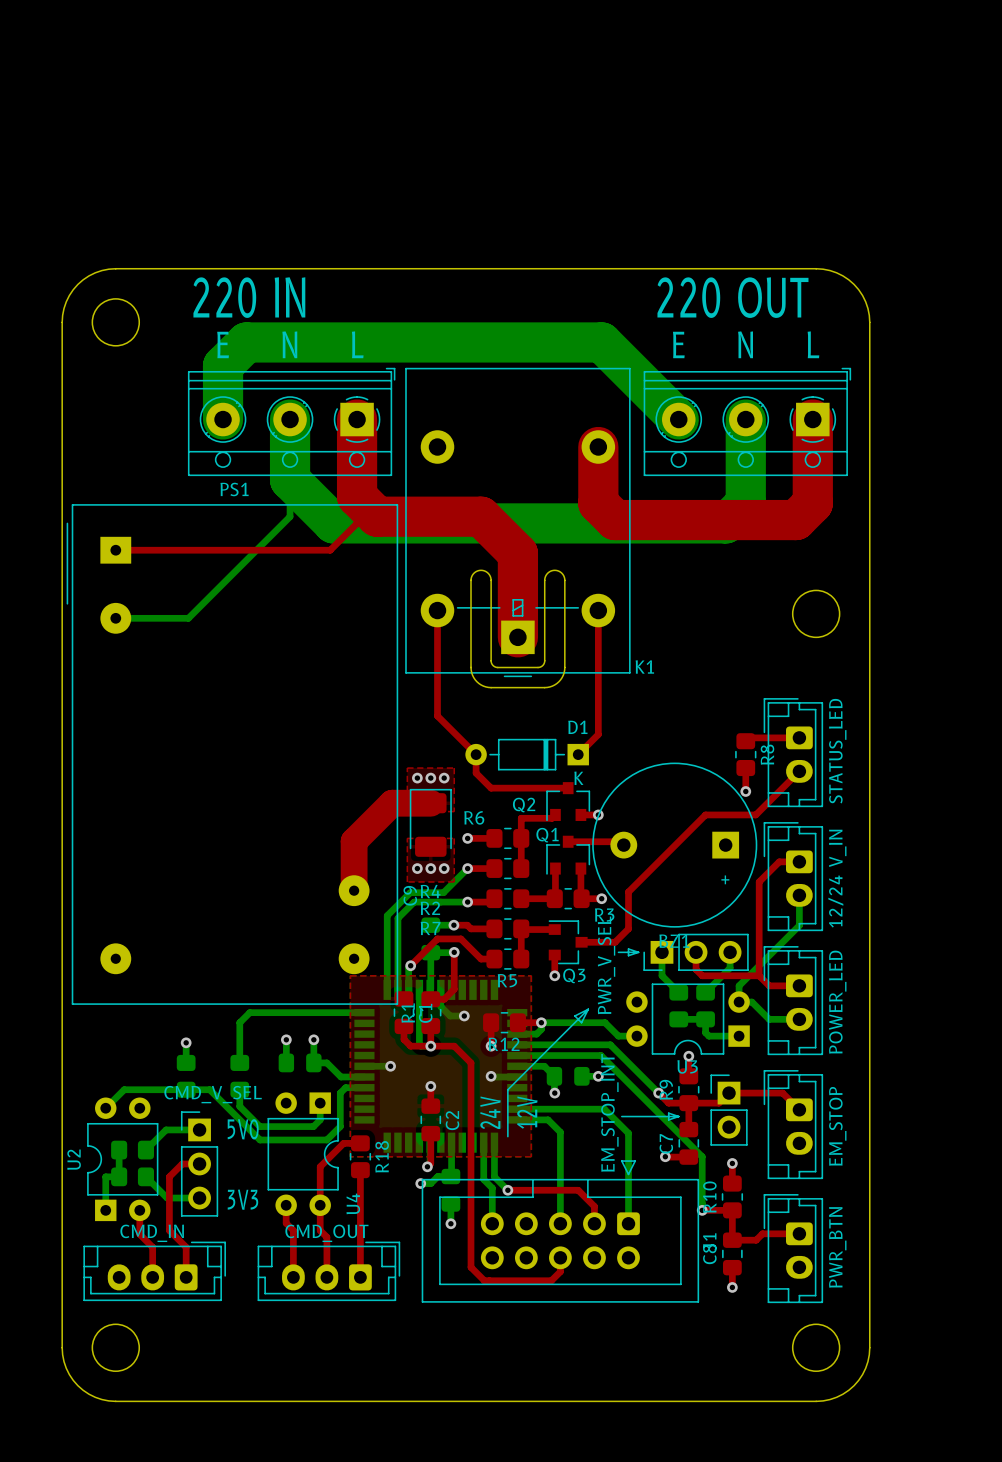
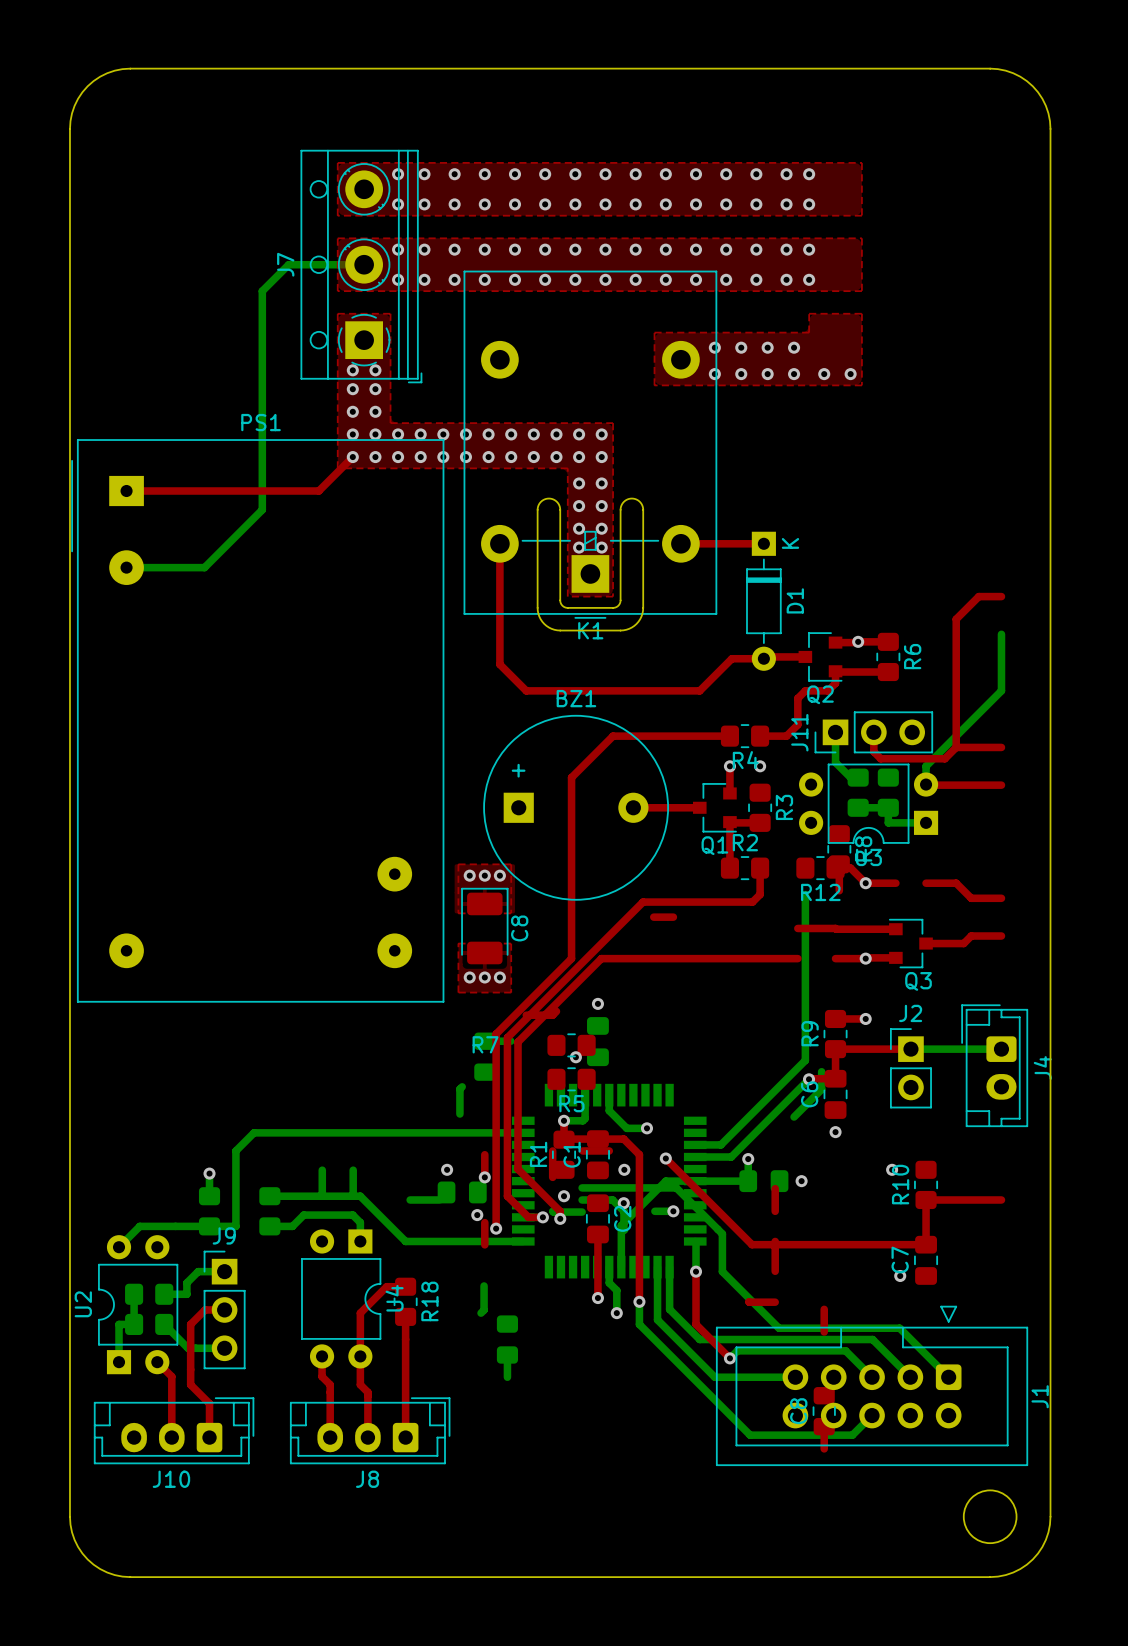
top zone outline: none -> (337, 162) (337, 215) (861, 215) (861, 162) (337, 162)
via: none -> (398, 174)
via: none -> (424, 174)
via: none -> (454, 174)
via: none -> (484, 174)
via: none -> (514, 174)
via: none -> (545, 174)
via: none -> (575, 174)
via: none -> (605, 174)
via: none -> (635, 174)
via: none -> (665, 174)
via: none -> (696, 174)
via: none -> (726, 174)
via: none -> (756, 174)
via: none -> (786, 174)
via: none -> (809, 174)
via: none -> (398, 204)
via: none -> (424, 204)
via: none -> (454, 204)
via: none -> (484, 204)
via: none -> (514, 204)
via: none -> (545, 204)
via: none -> (575, 204)
via: none -> (605, 204)
via: none -> (635, 204)
via: none -> (665, 204)
via: none -> (696, 204)
via: none -> (726, 204)
via: none -> (756, 204)
via: none -> (786, 204)
via: none -> (809, 204)
top zone outline: none -> (337, 238) (337, 291) (861, 291) (861, 238) (337, 238)
via: none -> (398, 249)
via: none -> (424, 249)
via: none -> (454, 249)
via: none -> (484, 249)
via: none -> (514, 249)
via: none -> (545, 249)
via: none -> (575, 249)
via: none -> (605, 249)
via: none -> (635, 249)
via: none -> (665, 249)
via: none -> (696, 249)
via: none -> (726, 249)
via: none -> (756, 249)
via: none -> (786, 249)
via: none -> (809, 249)
bottom track: none -> (364, 264) (288, 264) (262, 291) (262, 509) (204, 567) (126, 567)
J7: none -> (361, 266)
via: none -> (398, 279)
via: none -> (424, 279)
via: none -> (454, 279)
via: none -> (484, 279)
via: none -> (514, 279)
via: none -> (545, 279)
via: none -> (575, 279)
via: none -> (605, 279)
via: none -> (635, 279)
via: none -> (665, 279)
via: none -> (696, 279)
via: none -> (726, 279)
via: none -> (756, 279)
via: none -> (786, 279)
via: none -> (809, 279)
top zone outline: none -> (337, 313) (390, 313) (390, 423) (613, 423) (613, 596) (567, 596) (567, 468) (337, 468) (337, 313)
top zone outline: none -> (809, 313) (809, 332) (654, 332) (654, 385) (861, 385) (861, 313) (809, 313)
round board edge: [92, 298, 140, 347] -> none
via: none -> (714, 347)
via: none -> (741, 347)
via: none -> (767, 347)
via: none -> (794, 347)
board edge: (62, 322) (66, 301) (77, 284) (95, 272) (115, 268) (816, 268) (836, 272) (848, 279) (858, 289) (865, 301) (869, 322) (869, 1347) (865, 1368) (854, 1385) (836, 1397) (816, 1401) -> (69, 362) (70, 121) (74, 105) (82, 92) (100, 76) (114, 70) (130, 68) (990, 68) (1013, 73) (1026, 81) (1038, 92) (1045, 105) (1050, 128) (1049, 1524) (1045, 1539) (1038, 1553) (1026, 1564) (1013, 1572) (990, 1577) (918, 1577)
via: none -> (352, 370)
via: none -> (375, 370)
via: none -> (714, 374)
via: none -> (741, 374)
via: none -> (767, 374)
via: none -> (794, 374)
via: none -> (824, 374)
via: none -> (850, 374)
text: E (223, 344) -> none
text: N (289, 344) -> none
text: L (357, 344) -> none
text: E (678, 344) -> none
text: N (745, 344) -> none
text: L (813, 344) -> none
via: none -> (352, 389)
via: none -> (375, 389)
via: none -> (352, 411)
via: none -> (375, 411)
via: none -> (352, 434)
via: none -> (375, 434)
via: none -> (398, 434)
via: none -> (420, 434)
via: none -> (443, 434)
via: none -> (465, 434)
via: none -> (488, 434)
via: none -> (511, 434)
via: none -> (533, 434)
via: none -> (556, 434)
via: none -> (579, 434)
via: none -> (601, 434)
top track: none -> (352, 457) (318, 491) (126, 491)
via: none -> (352, 457)
via: none -> (375, 457)
via: none -> (398, 457)
via: none -> (420, 457)
via: none -> (443, 457)
via: none -> (465, 457)
via: none -> (488, 457)
via: none -> (511, 457)
via: none -> (533, 457)
via: none -> (556, 457)
via: none -> (579, 457)
via: none -> (601, 457)
bottom track: (223, 419) (223, 365) (246, 342) (601, 342) (678, 419) -> none
bottom track: (745, 419) (745, 503) (725, 523) (333, 523) (290, 479) (290, 419) (290, 516) (188, 618) (115, 618) -> none
top track: (812, 419) (812, 503) (796, 520) (615, 520) (598, 503) (598, 447) -> none
part: 220 IN (291, 421) -> none
part: 220 OUT (747, 421) -> none
via: none -> (579, 483)
via: none -> (601, 483)
via: none -> (579, 506)
via: none -> (601, 506)
via: none -> (579, 528)
via: none -> (601, 528)
top track: none -> (499, 543) (499, 664) (526, 690) (699, 690) (731, 658) (805, 656)
top track: none -> (680, 543) (763, 543)
via: none -> (579, 547)
via: none -> (601, 547)
K1 position: (517, 522) -> (590, 444)
top track: none -> (1001, 596) (978, 596) (956, 619) (956, 747)
top track: (115, 550) (330, 550) (357, 523) (357, 419) (357, 496) (377, 516) (481, 516) (517, 553) (517, 637) -> none
bottom track: none -> (1001, 634) (1001, 690) (926, 766) (926, 784)
via: none -> (858, 641)
top track: none -> (888, 641) (835, 642)
board edge: (471, 580) (471, 667) (475, 679) (483, 686) (491, 687) (544, 687) (556, 683) (563, 675) (564, 667) (564, 580) (562, 574) (553, 570) (548, 572) (545, 577) (544, 661) (538, 667) (497, 667) (492, 664) (490, 577) (487, 572) (479, 570) (473, 574) (471, 580) -> (537, 509) (537, 607) (542, 621) (551, 628) (560, 630) (620, 630) (634, 625) (641, 616) (643, 607) (643, 509) (640, 502) (636, 499) (630, 498) (625, 500) (620, 506) (620, 601) (618, 605) (614, 607) (567, 607) (561, 604) (559, 506) (555, 500) (547, 498) (539, 502) (537, 509)
round board edge: [792, 590, 840, 638] -> none
top track: none -> (888, 672) (835, 671) (835, 683) (828, 690) (805, 690) (797, 698) (797, 724) (786, 736) (760, 736)
top track: (437, 610) (437, 716) (476, 754) (476, 773) (491, 788) (568, 788) -> none
top track: (598, 610) (598, 734) (578, 754) -> none
bottom track: none -> (835, 732) (835, 762) (850, 777) (858, 777)
top track: none -> (873, 732) (873, 751) (880, 758) (944, 758) (956, 747)
J11: none -> (873, 732)
top track: none -> (729, 736) (613, 736) (571, 777) (571, 958) (496, 1034) (496, 1228)
top track: none -> (956, 747) (1001, 747)
K1 name position: K1 (644, 667) -> K1 (590, 630)
top track: none -> (729, 766) (729, 793)
via: none -> (729, 766)
via: none -> (760, 766)
top track: none -> (926, 784) (1001, 785)
part: none -> (858, 792)
part: none -> (888, 792)
top track: none -> (633, 807) (699, 807)
bottom track: none -> (858, 807) (888, 807) (888, 822) (926, 822)
D1 name position: D1 (577, 727) -> D1 (795, 600)
top track: none -> (760, 822) (729, 822) (729, 868)
top track: (799, 737) (749, 737) (745, 741) -> none
part: STATUS_LED (793, 752) -> none
PS1 position: (232, 754) -> (257, 720)
D1 rotation: 0° (527, 754) -> 90° counterclockwise (763, 601)
D1 position: (527, 754) -> (763, 601)
top track: none -> (760, 868) (760, 894) (752, 902) (643, 902) (507, 1037) (507, 1196) (528, 1217) (542, 1217)
top track: none -> (835, 868) (850, 868) (865, 883) (895, 883)
top track: (799, 771) (755, 814) (705, 814) (628, 892) (628, 928) (615, 942) (581, 942) -> none
top track: none -> (926, 883) (956, 883) (971, 898) (1001, 898)
via position: (745, 791) -> (865, 883)
bottom track: none -> (805, 894) (805, 1060) (720, 1144) (695, 1144)
Q2 rotation: 0° (568, 801) -> 90° counterclockwise (820, 656)
Q2 position: (568, 801) -> (820, 656)
top track: (430, 803) (392, 803) (354, 841) (354, 890) -> none
top track: (555, 814) (552, 818) (521, 818) (521, 868) -> none
via: (598, 814) -> none
R6 name position: R6 (474, 817) -> R6 (912, 656)
top track: none -> (797, 928) (895, 929)
top track: none -> (1001, 936) (971, 936) (963, 943) (926, 943)
top track: (467, 838) (494, 838) -> none
via: (467, 838) -> none
R6 rotation: 0° (507, 838) -> 90° clockwise (888, 656)
R6 position: (507, 838) -> (888, 656)
top track: (568, 841) (620, 841) (623, 845) -> none
BZ1 rotation: 0° (674, 845) -> 180° (576, 807)
BZ1 position: (674, 845) -> (576, 807)
top track: none -> (797, 958) (601, 958) (518, 1042) (518, 1169) (560, 1211) (560, 1218)
via: none -> (865, 958)
top track: none -> (895, 957) (835, 958)
Q1 rotation: 0° (568, 855) -> 90° counterclockwise (714, 807)
Q1 position: (568, 855) -> (714, 807)
top track: (799, 861) (779, 861) (759, 881) (759, 975) -> none
top track: (467, 868) (494, 868) -> (835, 1018) (865, 1018)
bottom track: (467, 868) (443, 892) (410, 892) (387, 915) (387, 989) -> none
via: (467, 868) -> none
R4 position: (507, 868) -> (745, 736)
top track: (555, 868) (554, 898) (521, 898) -> none
top track: (580, 868) (580, 898) (601, 898) -> none
part: 12/24 V_IN (793, 876) -> none
R4 name position: R4 (430, 891) -> R4 (745, 760)
via: none -> (597, 1003)
C9 name: C9 (410, 895) -> C8 (519, 928)
bottom track: (799, 895) (799, 925) (739, 985) (739, 1002) (751, 1002) (769, 1019) (799, 1019) -> none
R2 position: (507, 898) -> (745, 868)
R3 rotation: 0° (568, 898) -> 90° clockwise (760, 807)
R3 position: (568, 898) -> (760, 807)
via: (601, 898) -> none
bottom track: (467, 902) (414, 902) (397, 918) (397, 989) -> none
via: (467, 902) -> none
via: none -> (865, 1018)
R2 name position: R2 (430, 908) -> R2 (745, 842)
top track: (453, 925) (467, 925) (471, 928) (494, 928) -> none
via: (453, 925) -> none
part: none -> (597, 1041)
top track: (554, 929) (521, 928) (521, 959) -> none
top track: none -> (910, 1049) (835, 1049) (835, 1078) (809, 1079)
bottom track: none -> (910, 1049) (1001, 1049)
via: none -> (575, 1057)
Q3 position: (568, 942) -> (910, 943)
J4: none -> (994, 1065)
J2: none -> (910, 1068)
top track: (454, 952) (454, 989) (444, 999) (430, 999) -> none
bottom track: (454, 952) (430, 952) (430, 989) -> none
via: (454, 952) -> none
line: (618, 952) (638, 952) -> none
line: (638, 952) (628, 955) (628, 948) (638, 952) -> none
bottom track: (662, 952) (662, 975) (678, 992) -> none
top track: (696, 952) (696, 969) (702, 975) (759, 975) -> none
part: PWR_V_SEL (696, 952) -> none
top track: (554, 955) (554, 975) -> none
top track: (494, 959) (481, 959) (460, 938) (437, 938) (410, 965) -> none
bottom track: none -> (809, 1079) (731, 1157) (695, 1157)
via: none -> (809, 1079)
via: (410, 965) -> none
C6: none -> (835, 1094)
bottom track: none -> (585, 1095) (585, 1118) (582, 1120) (564, 1120)
bottom track: none -> (609, 1095) (609, 1110) (626, 1128) (646, 1128)
top zone outline: (350, 975) (350, 1156) (531, 1156) (531, 975) (350, 975) -> none
via: (554, 975) -> none
top track: (759, 975) (769, 985) (799, 985) -> none
bottom track: (419, 989) (419, 1044) (430, 1046) -> none
bottom track: (440, 989) (440, 1006) (450, 1016) (464, 1016) -> none
C1 footprint: [393, 991, 415, 1035] -> [585, 1130, 610, 1180]
top track: none -> (564, 1120) (564, 1139) (623, 1139) (639, 1154) (639, 1301)
via: none -> (564, 1120)
part: POWER_LED (793, 1000) -> none
via: none -> (646, 1128)
part: (678, 1005) -> none
part: (705, 1005) -> none
via: none -> (835, 1132)
line: (588, 1009) (581, 1022) (574, 1016) (588, 1009) -> none
line: (588, 1009) (507, 1089) (507, 1136) -> none
bottom track: (364, 1012) (249, 1012) (239, 1022) (239, 1062) -> (353, 1196) (269, 1196)
R1 position: (430, 1012) -> (564, 1154)
C1 name position: C1 (425, 1013) -> C1 (572, 1154)
via: (464, 1016) -> none
bottom track: (678, 1019) (705, 1019) (705, 1032) (708, 1036) (739, 1036) -> none
U3 position: (688, 1019) -> (868, 803)
R12 position: (504, 1022) -> (820, 868)
via: (541, 1022) -> none
top track: (403, 1026) (403, 1039) (410, 1046) (454, 1046) (471, 1062) (471, 1267) (484, 1280) (551, 1280) (560, 1271) (560, 1257) -> none
top track: none -> (665, 1158) (752, 1244) (926, 1244) (926, 1199) (1001, 1199)
via: none -> (665, 1158)
bottom track: none -> (748, 1159) (748, 1181) (665, 1181) (621, 1225) (621, 1267)
via: none -> (748, 1159)
bottom track: (517, 1034) (536, 1034) (541, 1029) (541, 1022) (605, 1022) (618, 1036) (636, 1036) -> none
via: (286, 1039) -> none
via: (313, 1039) -> none
via: none -> (447, 1169)
via: none -> (624, 1169)
via: none -> (892, 1169)
bottom track: (517, 1044) (610, 1044) (658, 1093) -> none
via: (491, 1046) -> none
part: none -> (763, 1181)
via: none -> (801, 1181)
via: (688, 1056) -> none
part: none -> (462, 1192)
part: (300, 1062) -> none
bottom track: (320, 1062) (326, 1062) (340, 1077) (364, 1077) -> (360, 1196) (405, 1241) (523, 1241)
via: none -> (564, 1196)
via: (390, 1066) -> none
part position: (440, 1066) -> (609, 1181)
via: none -> (623, 1203)
via: (491, 1076) -> none
part: (568, 1076) -> none
via: none -> (477, 1215)
via: none -> (542, 1217)
via: none -> (560, 1218)
via: (430, 1086) -> none
bottom track: (364, 1087) (345, 1087) (340, 1093) (340, 1126) (326, 1139) (260, 1139) (209, 1089) -> (523, 1132) (254, 1132) (235, 1150) (235, 1226)
bottom track: (239, 1089) (239, 1106) (259, 1126) (313, 1126) (320, 1119) (320, 1103) -> (269, 1226) (292, 1226) (303, 1215) (352, 1215) (360, 1222) (360, 1241)
R9 position: (688, 1089) -> (835, 1034)
via: none -> (496, 1228)
via: (554, 1093) -> none
top track: (658, 1093) (668, 1103) (718, 1103) (729, 1093) (782, 1093) (799, 1109) -> none
via: (658, 1093) -> none
J9 value: CMD_V_SEL (213, 1094) -> none
top track: none -> (597, 1234) (597, 1298)
bottom track: (641, 1096) (702, 1156) (702, 1210) -> (722, 1233) (722, 1271) (778, 1328) (899, 1328) (948, 1377)
J9 name: none -> J9 (224, 1235)
C2 footprint: [420, 1098, 442, 1142] -> [585, 1194, 610, 1244]
bottom track: none -> (695, 1241) (696, 1271)
bottom track: (517, 1109) (604, 1109) (628, 1133) (628, 1223) -> none
part: EM_STOP_INT (729, 1110) -> none
text: 24V (490, 1112) -> none
text: 12V (527, 1112) -> none
line: (621, 1116) (678, 1116) -> none
line: (678, 1116) (668, 1119) (668, 1113) (678, 1116) -> none
bottom track: (517, 1119) (548, 1119) (560, 1132) (560, 1223) -> none
C7 footprint: [678, 1121, 700, 1165] -> [914, 1235, 939, 1285]
part: EM_STOP (793, 1124) -> none
bottom track: none -> (609, 1267) (609, 1282) (616, 1290) (616, 1313)
bottom track: none -> (657, 1267) (657, 1319) (714, 1377) (795, 1377)
bottom track: none -> (669, 1267) (669, 1309) (699, 1339) (872, 1339) (910, 1377)
bottom track: (176, 1129) (166, 1129) (145, 1150) -> (198, 1271) (186, 1282) (186, 1294) (164, 1294)
text: 5V0 (243, 1129) -> none
top track: none -> (696, 1271) (696, 1324) (729, 1358)
via: none -> (696, 1271)
top track: (430, 1133) (430, 1163) (427, 1166) -> none
via: none -> (900, 1275)
bottom track: (451, 1142) (451, 1175) (437, 1176) (430, 1183) (420, 1183) -> none
bottom track: (483, 1142) (483, 1179) (492, 1188) (492, 1223) -> none
bottom track: (494, 1142) (494, 1176) (507, 1190) -> none
via: none -> (597, 1298)
bottom track: none -> (639, 1301) (639, 1324) (750, 1435) (852, 1435) (872, 1415)
via: none -> (639, 1301)
via: (665, 1156) -> none
via: (732, 1163) -> none
via: (427, 1166) -> none
via: none -> (616, 1313)
via: (420, 1183) -> none
top track: (507, 1190) (578, 1190) (594, 1206) (594, 1223) -> none
via: (507, 1190) -> none
R10 position: (732, 1196) -> (926, 1184)
text: 3V3 (242, 1199) -> none
U4 name position: U4 (353, 1203) -> U4 (394, 1298)
bottom track: none -> (729, 1358) (737, 1350) (845, 1350) (872, 1377)
via: none -> (729, 1358)
top track: (139, 1210) (139, 1234) (152, 1247) -> (157, 1362) (171, 1376) (171, 1403)
top track: (702, 1210) (732, 1210) (732, 1240) (756, 1240) (762, 1233) (799, 1233) -> none
via: (702, 1210) -> none
via: (450, 1223) -> none
J1 position: (560, 1231) -> (872, 1385)
J10 value: CMD_IN (152, 1233) -> none
J8 value: CMD_OUT (326, 1233) -> none
part: PWR_BTN (793, 1248) -> none
via: (732, 1287) -> none
J10 name: none -> J10 (171, 1479)
J8 name: none -> J8 (367, 1479)
round board edge: [92, 1323, 140, 1372] -> none
round board edge position: (816, 1347) -> (990, 1516)

